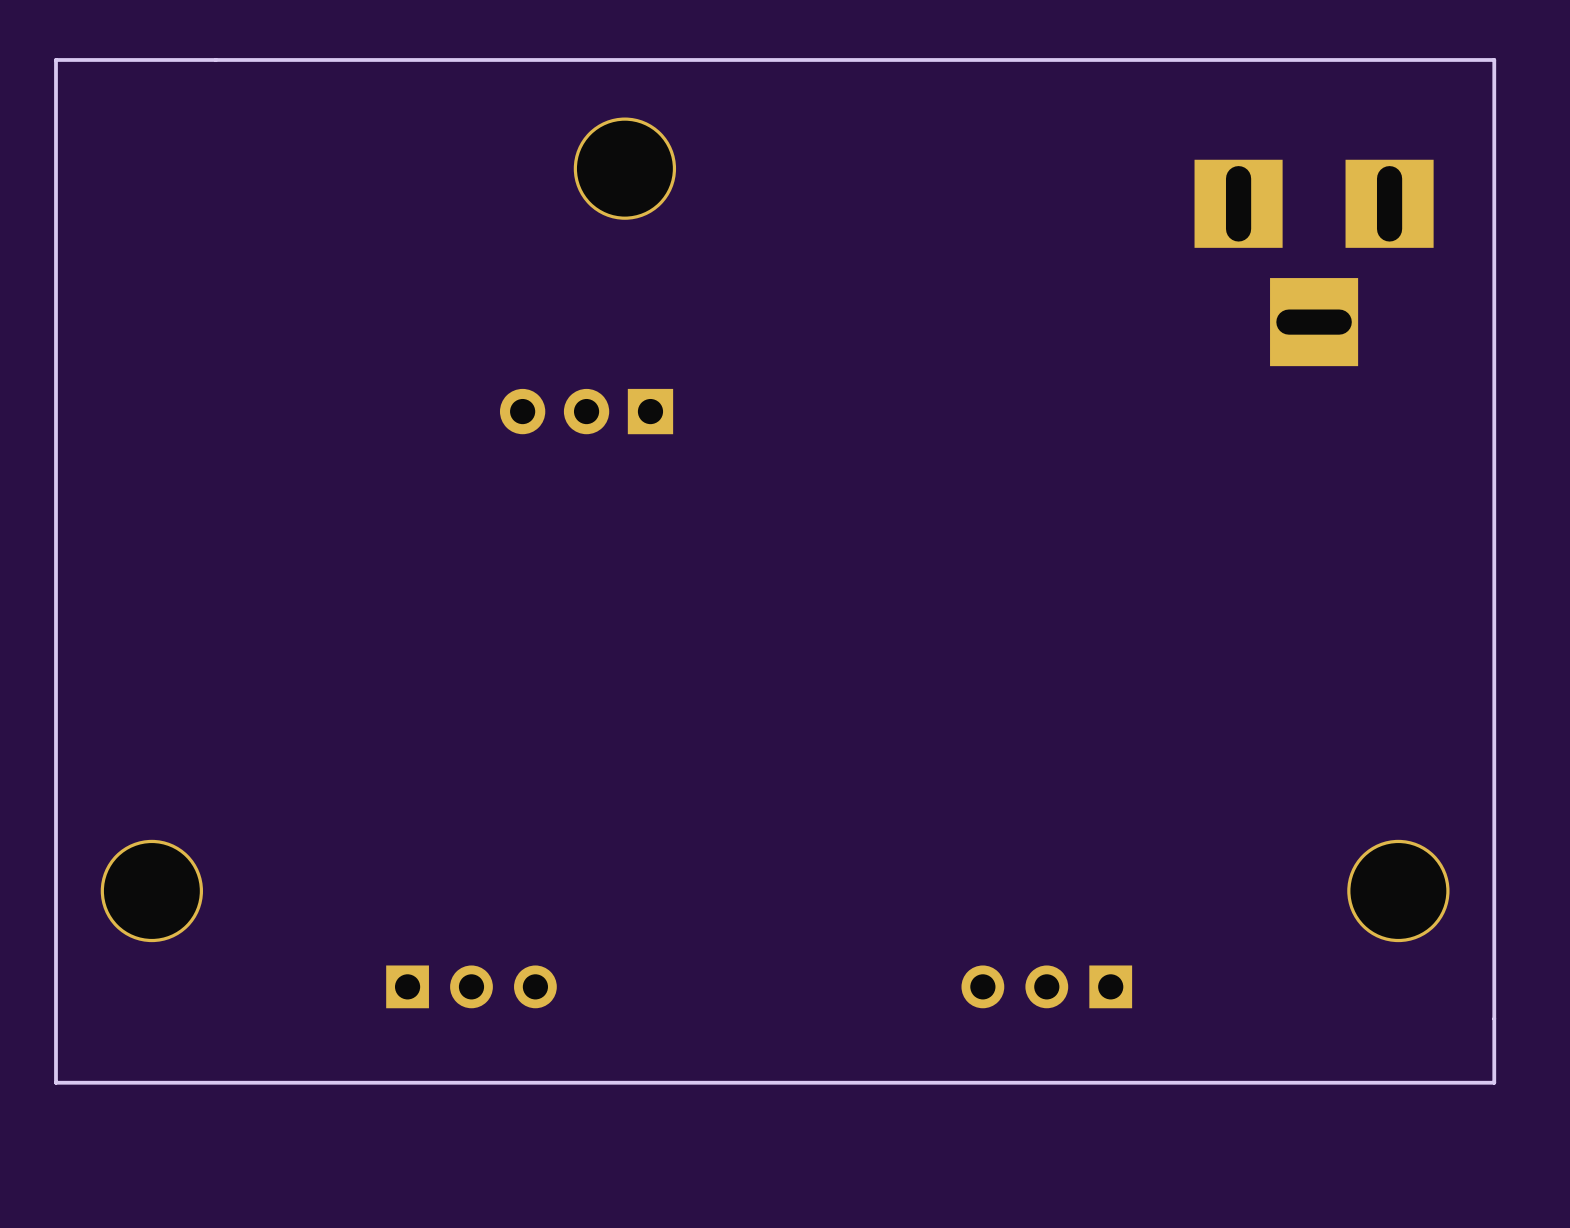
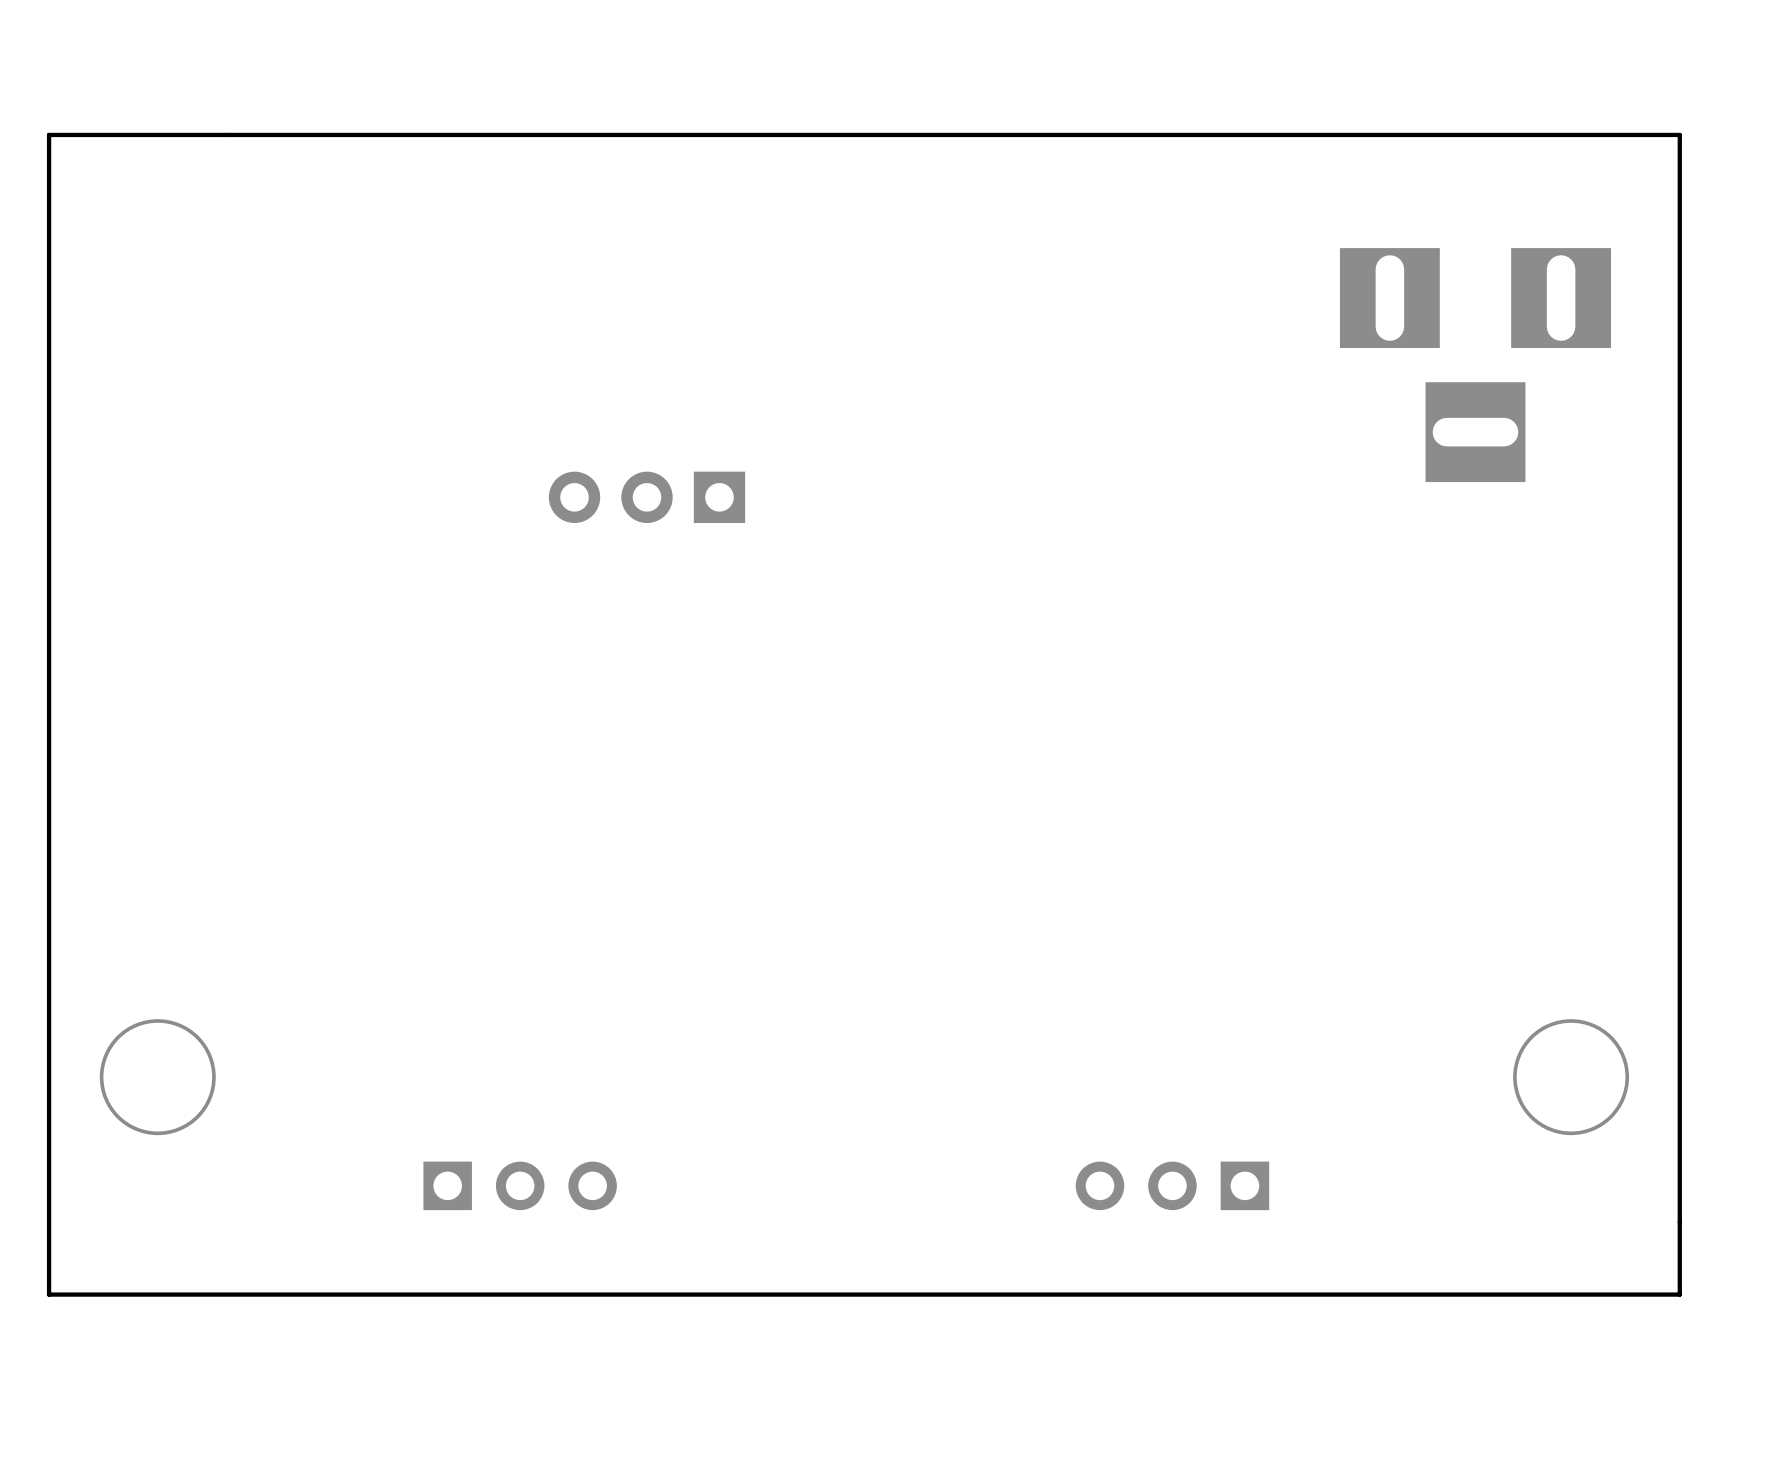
part: (624, 168) -> none
part position: (586, 411) -> (647, 497)

